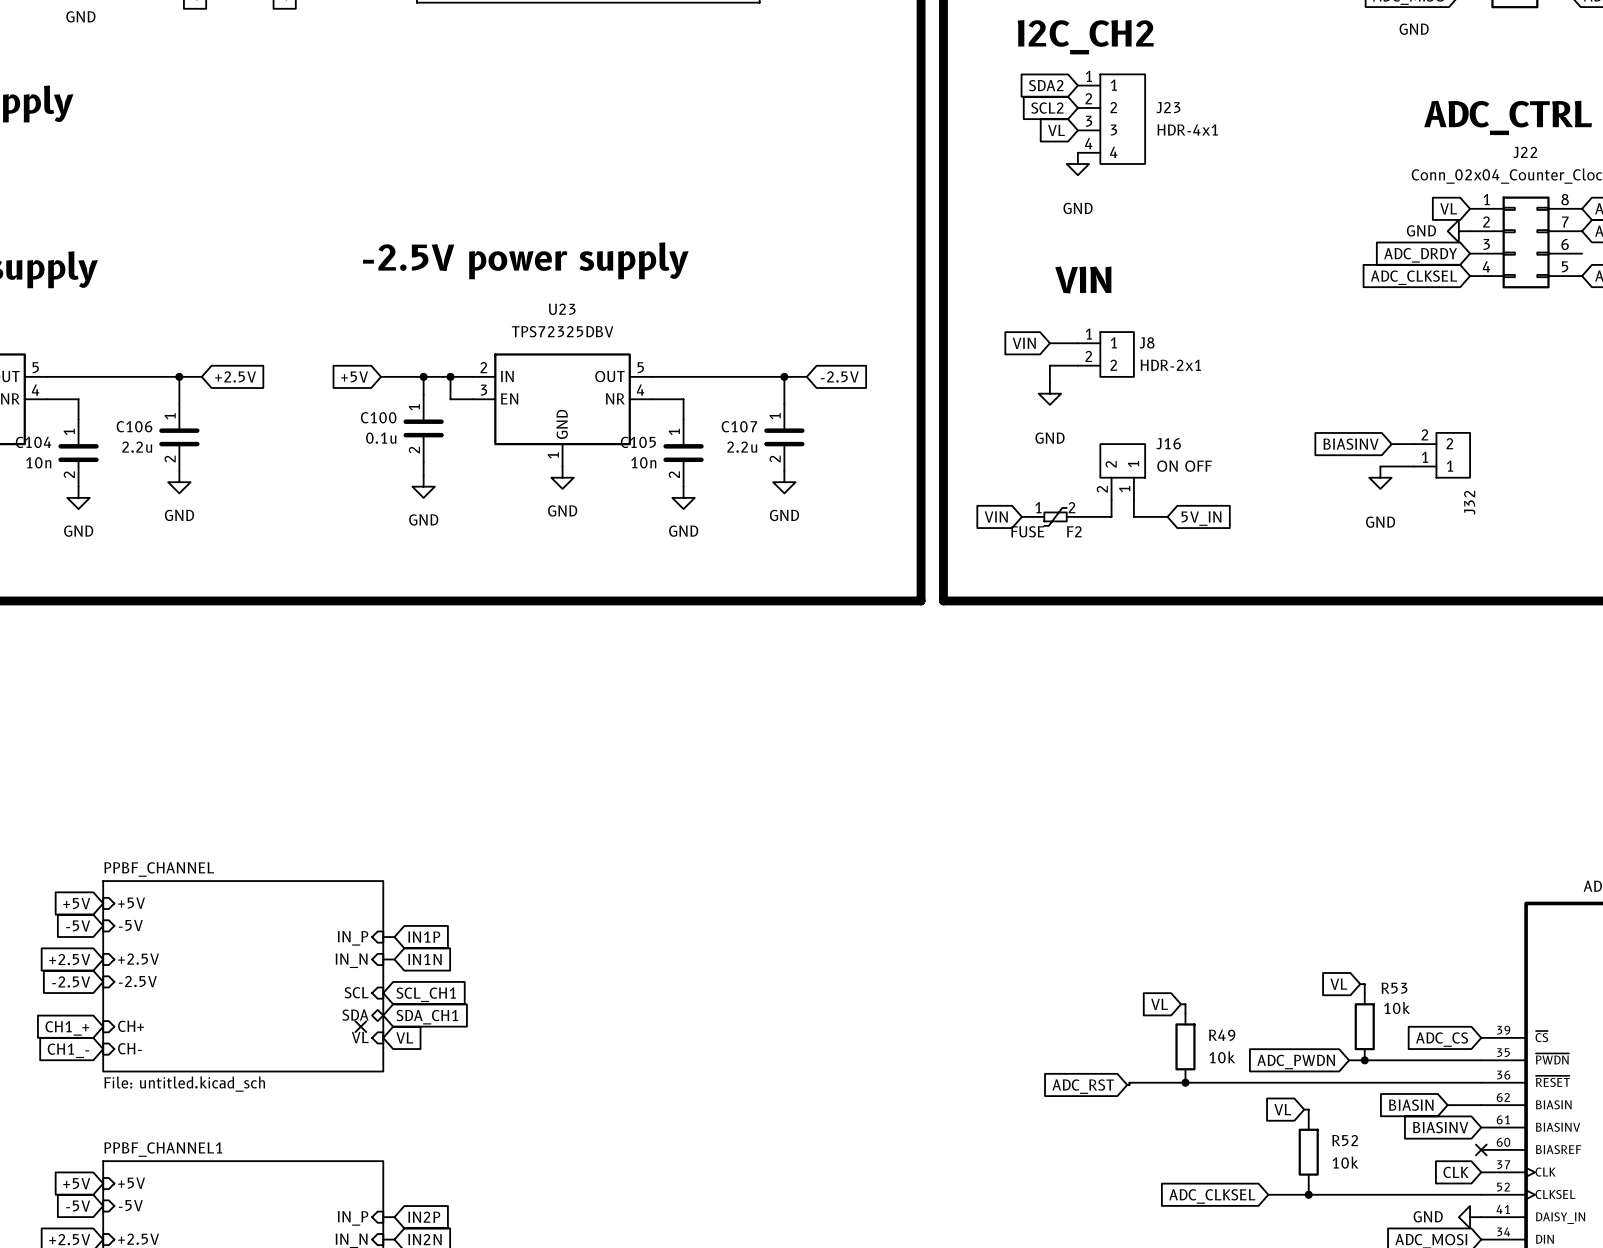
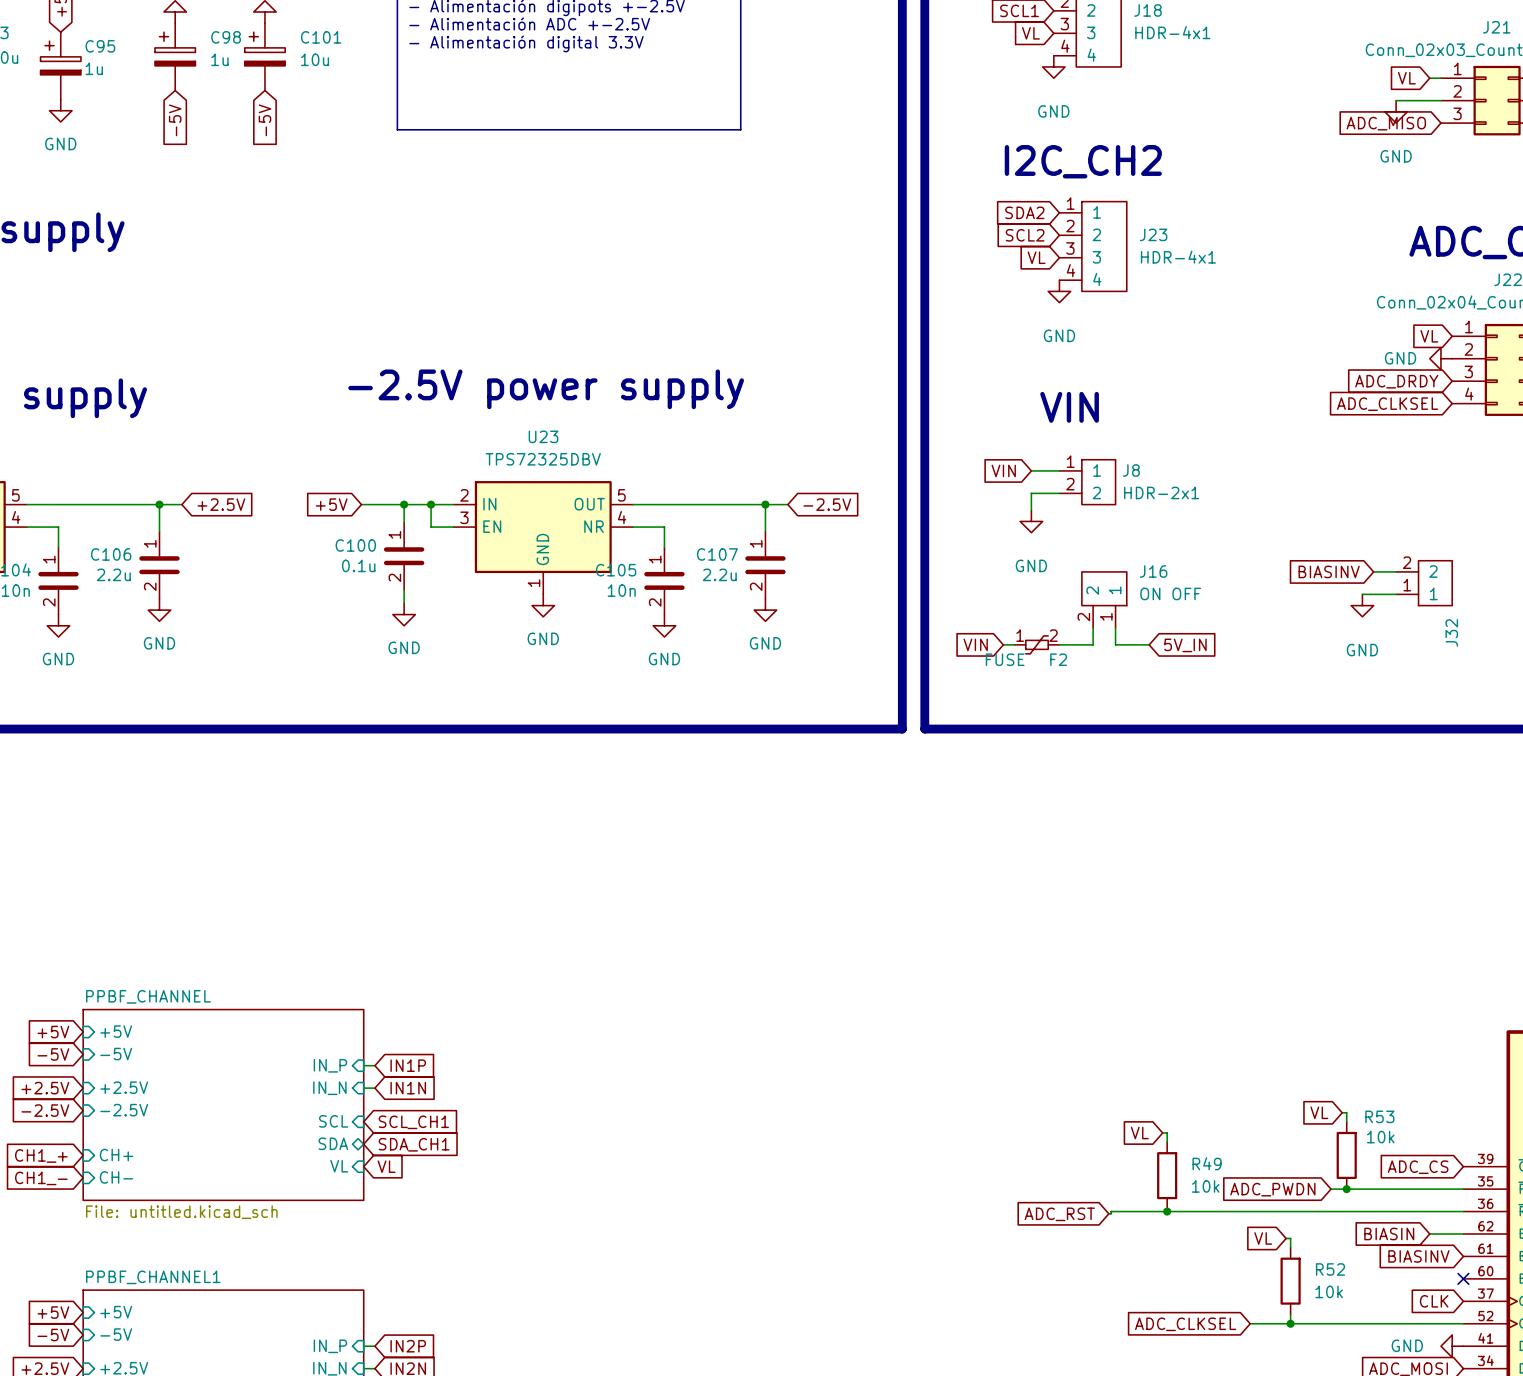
no-connect mark: (360, 1026) -> none

